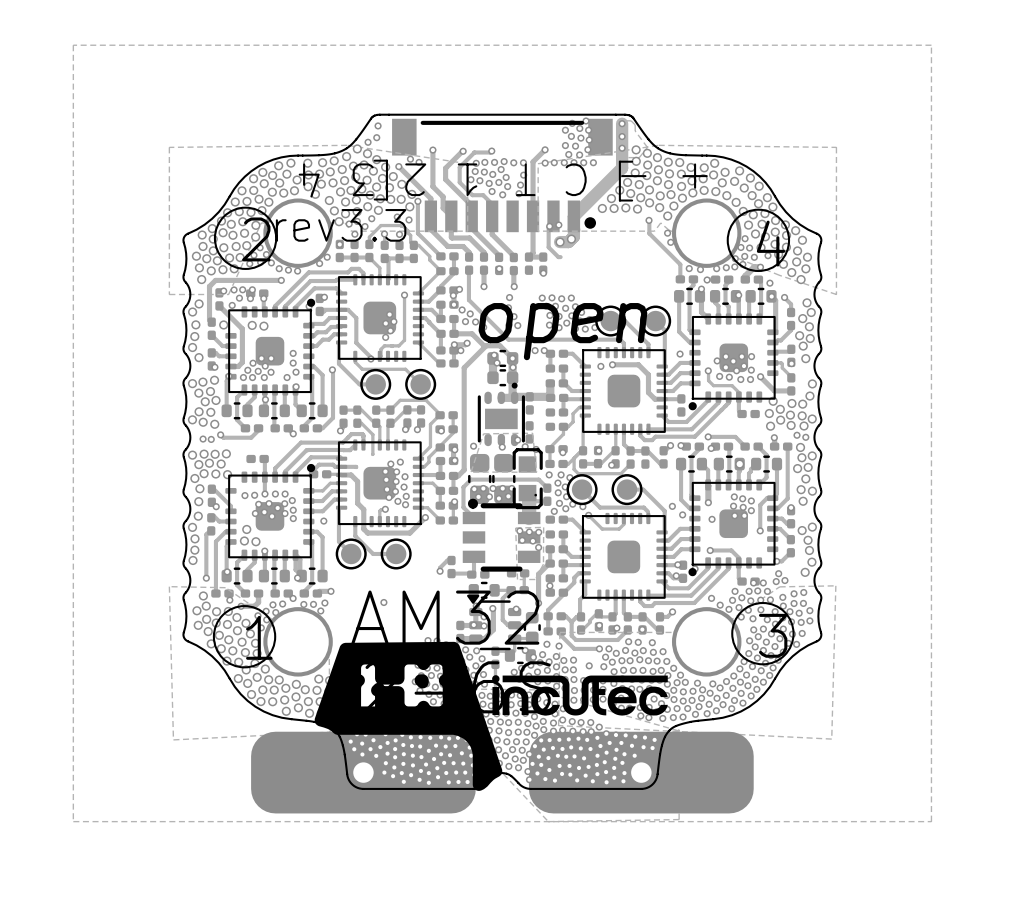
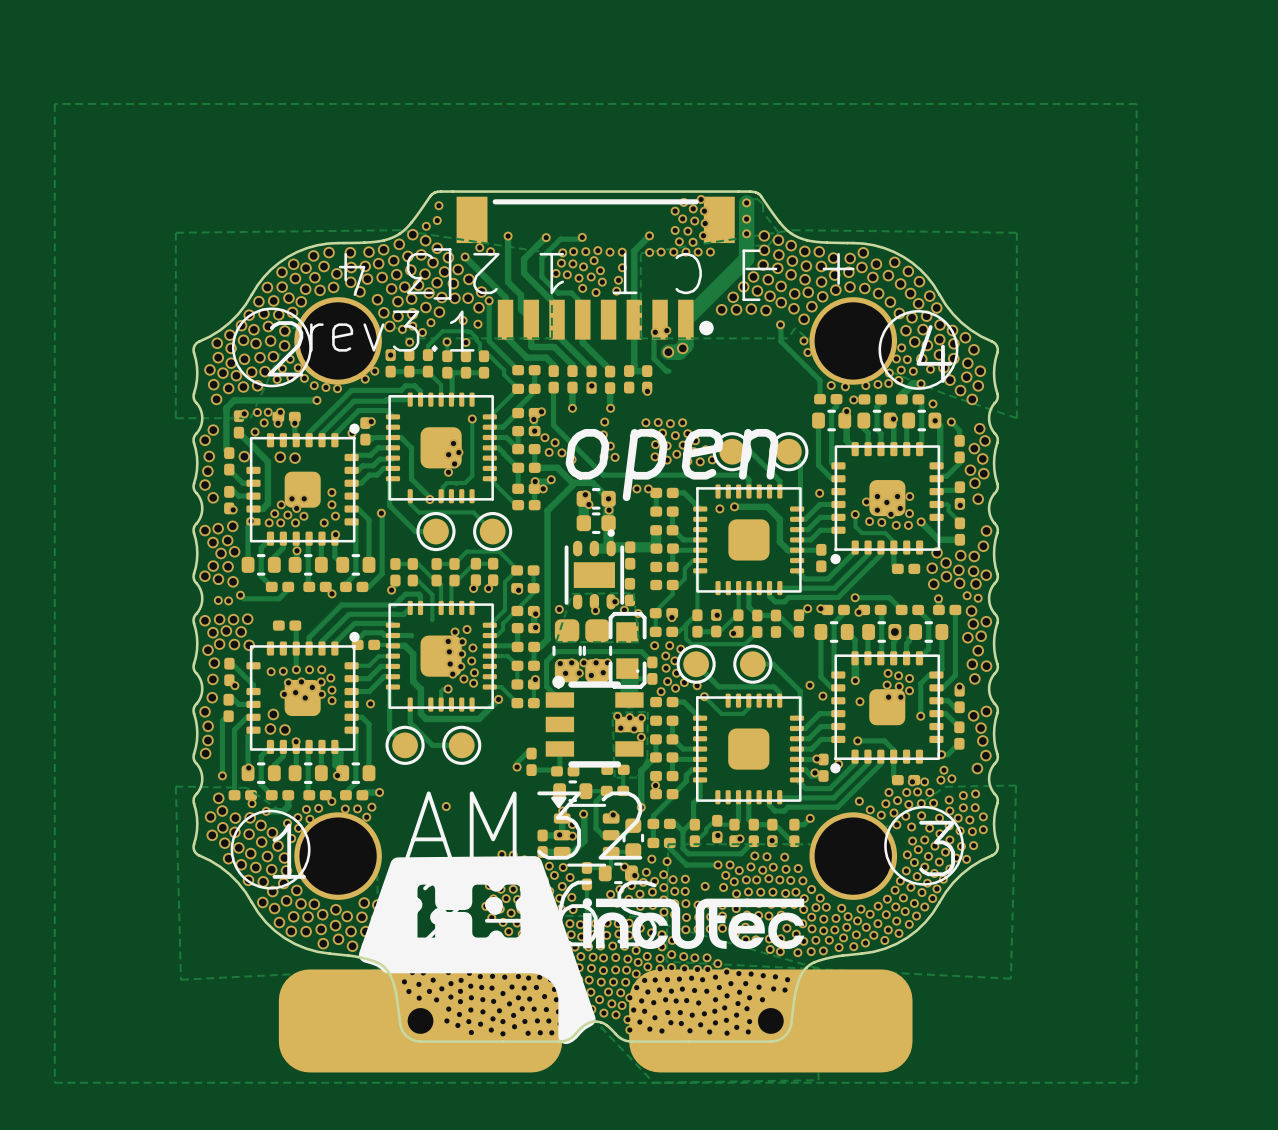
text: rev3.3 (341, 225) -> rev3.1 (392, 331)

